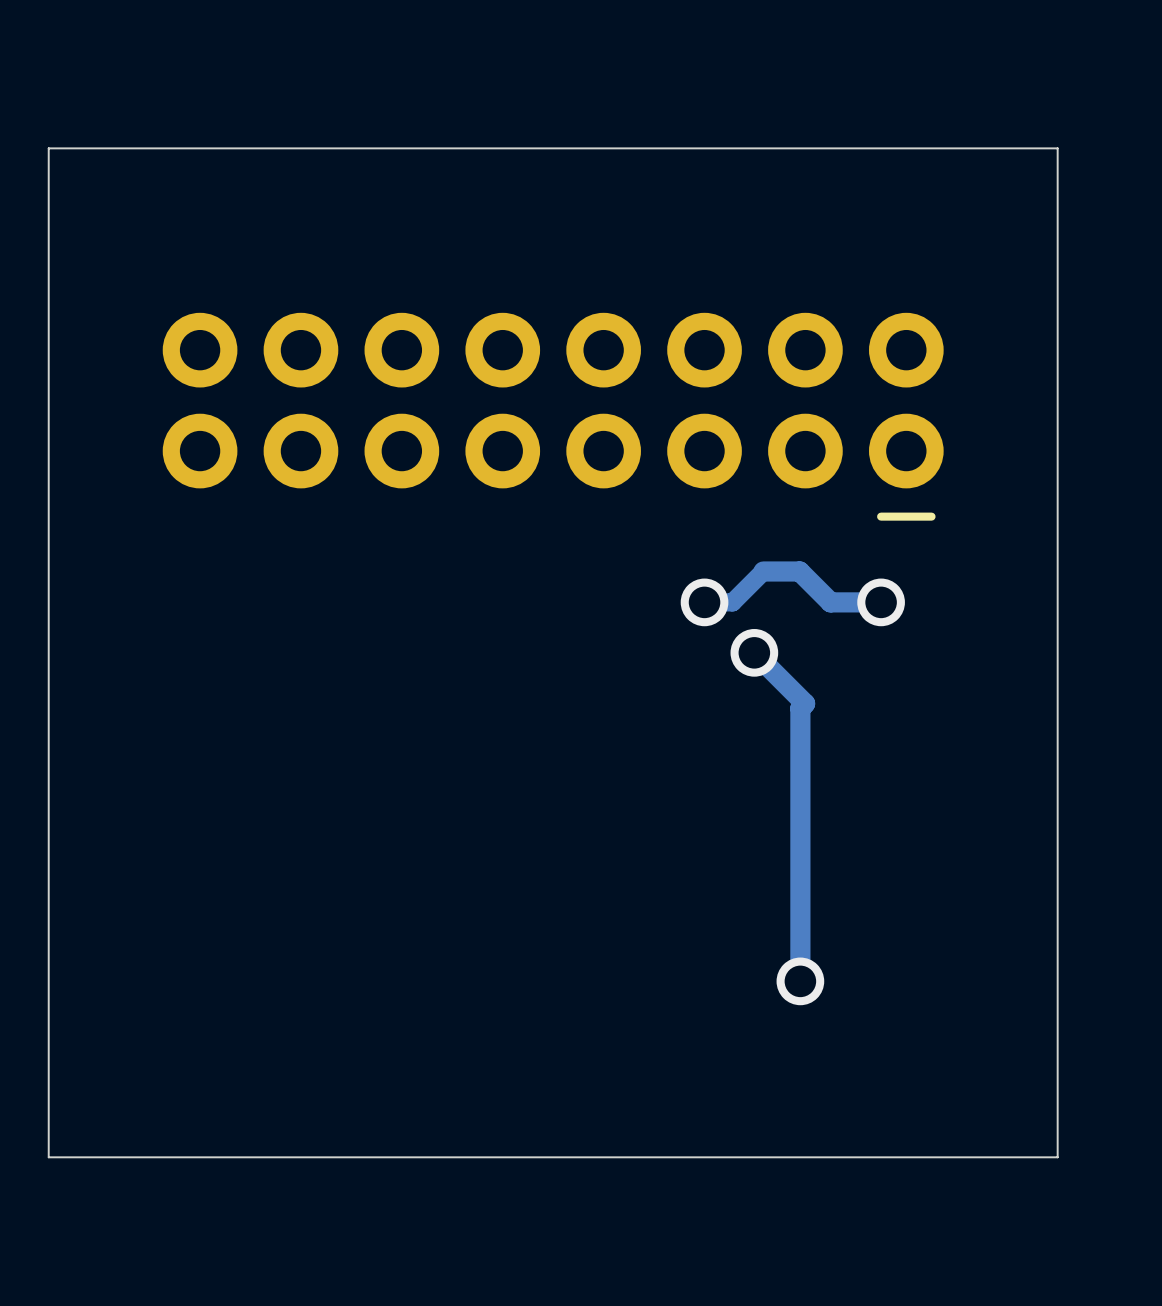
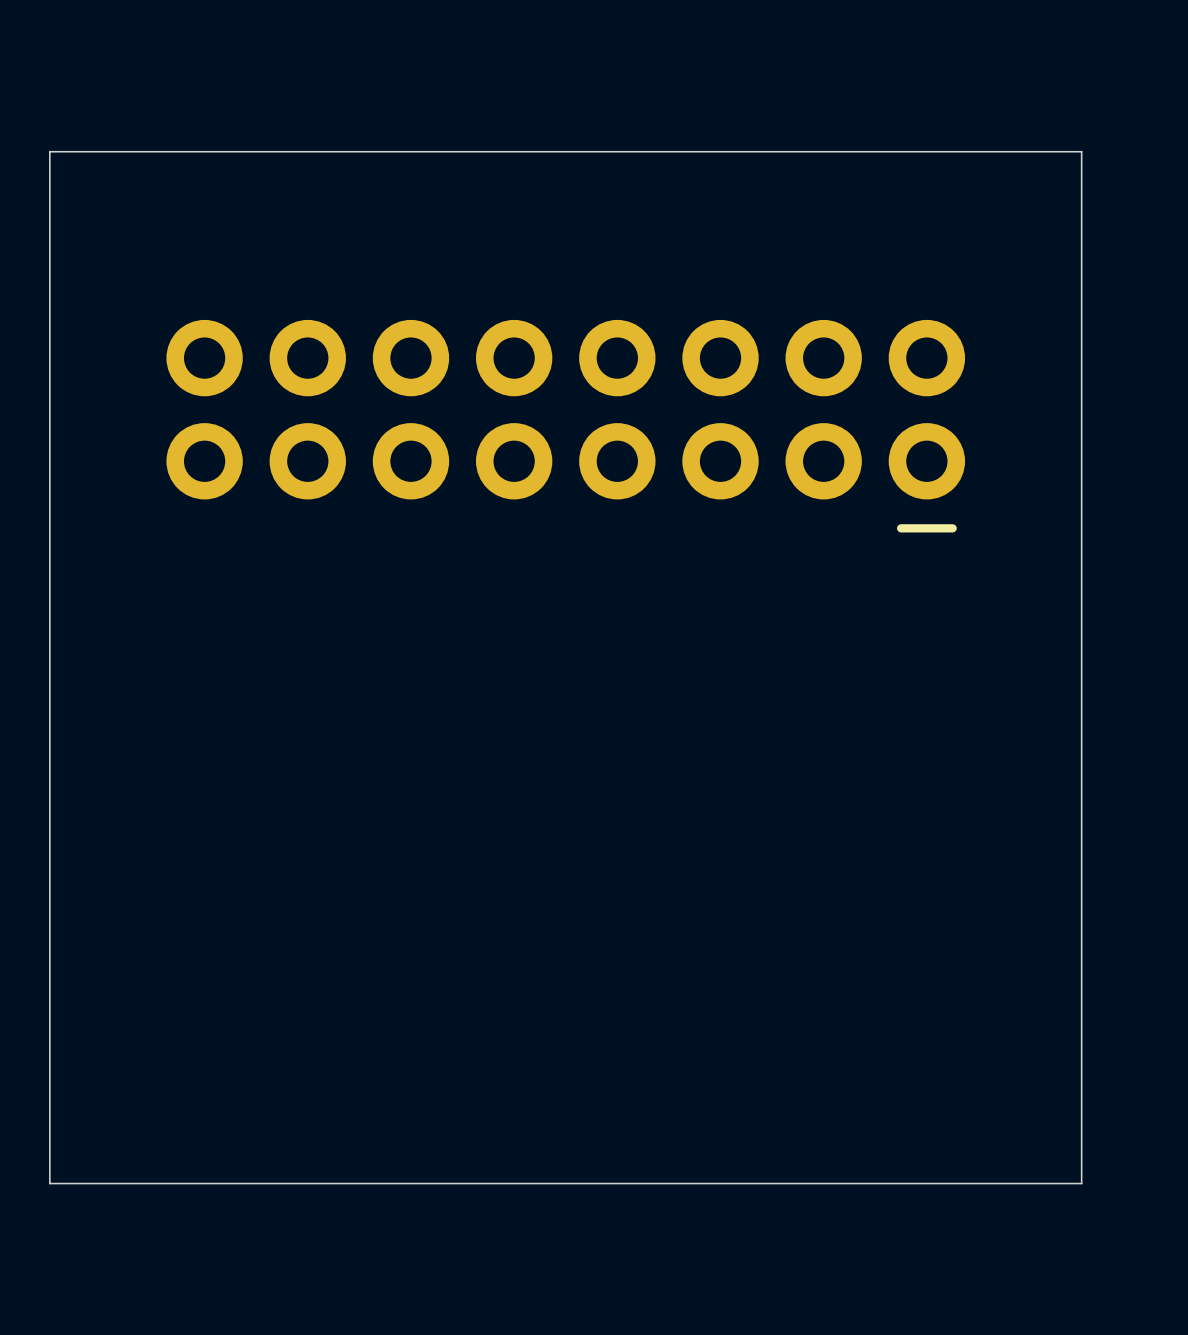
via: (704, 602) -> none
track: (881, 602) (830, 602) (799, 571) (763, 571) (732, 602) (704, 602) -> none
via: (881, 602) -> none
track: (754, 652) (805, 703) (800, 708) (800, 981) -> none
via: (754, 652) -> none
via: (800, 981) -> none

